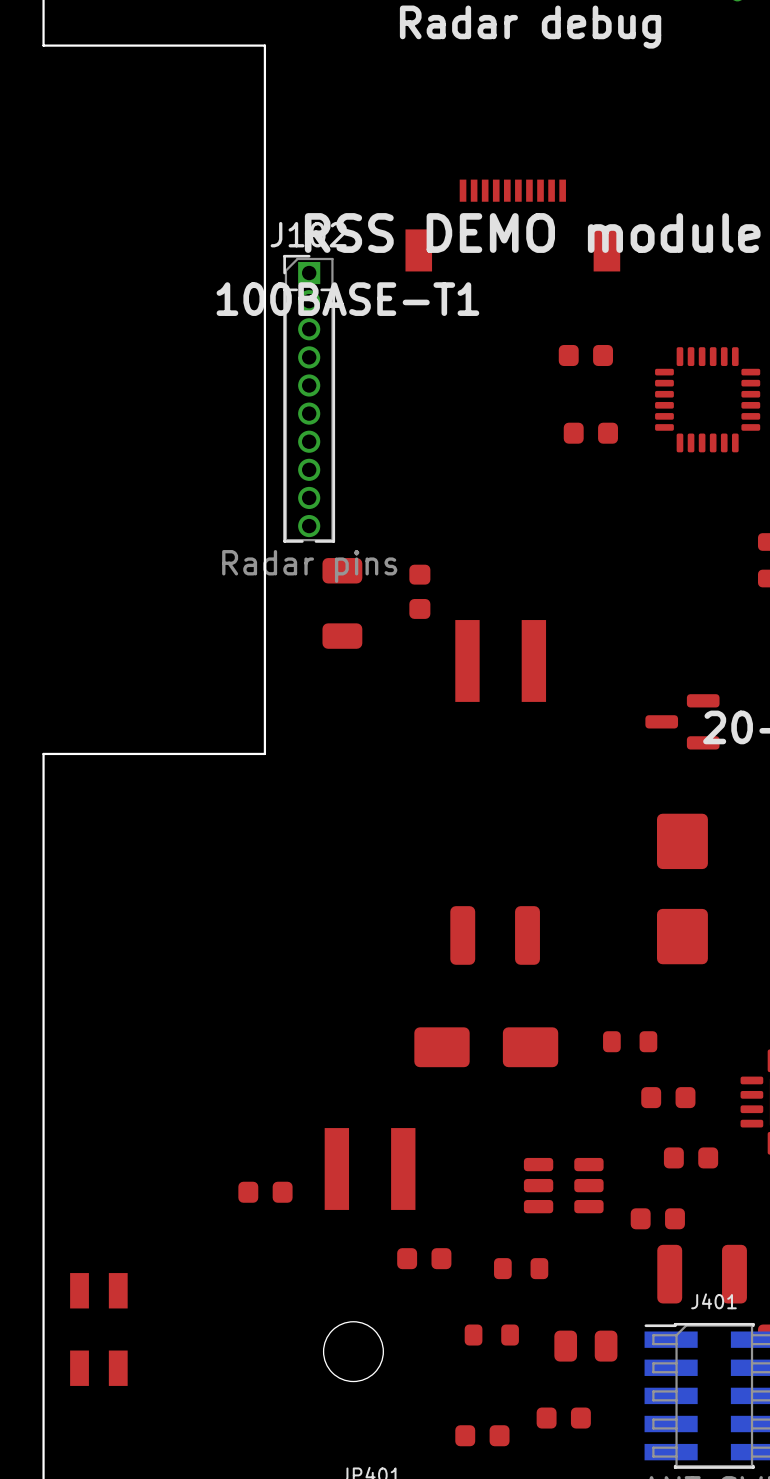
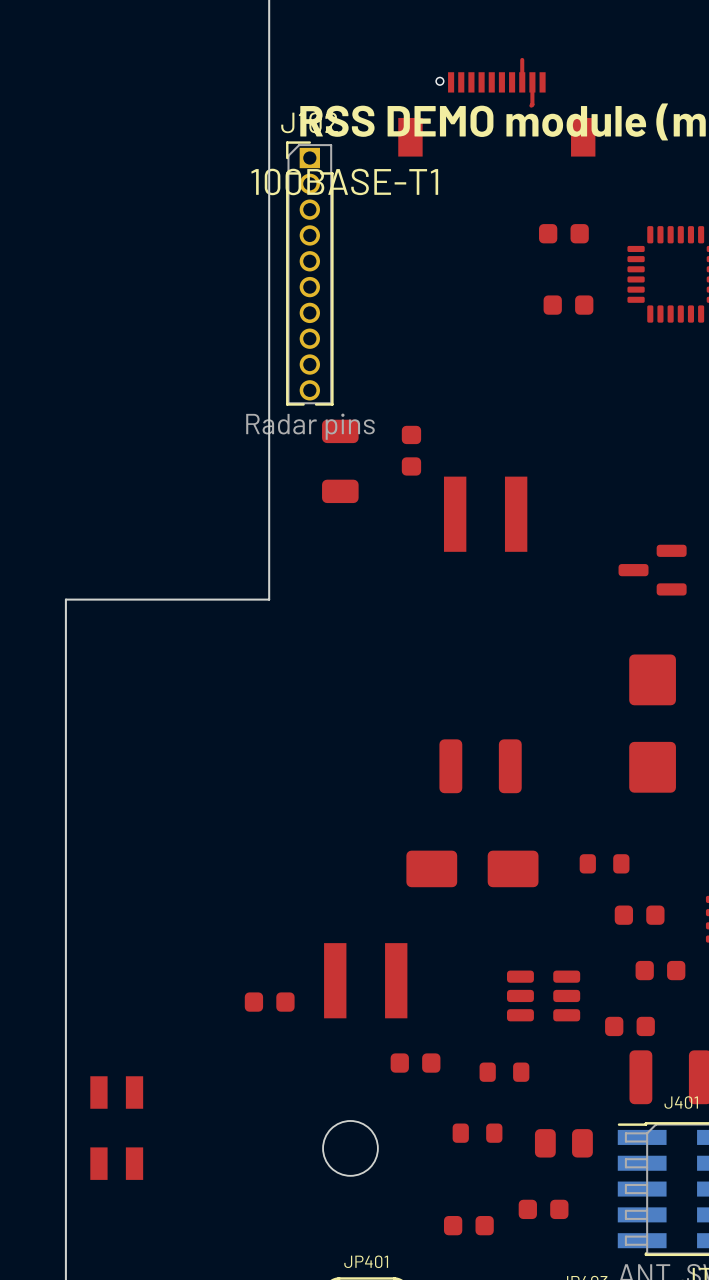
top track: none -> (522, 59) (522, 82)
via: none -> (439, 81)
top track: none -> (532, 82) (531, 105)

